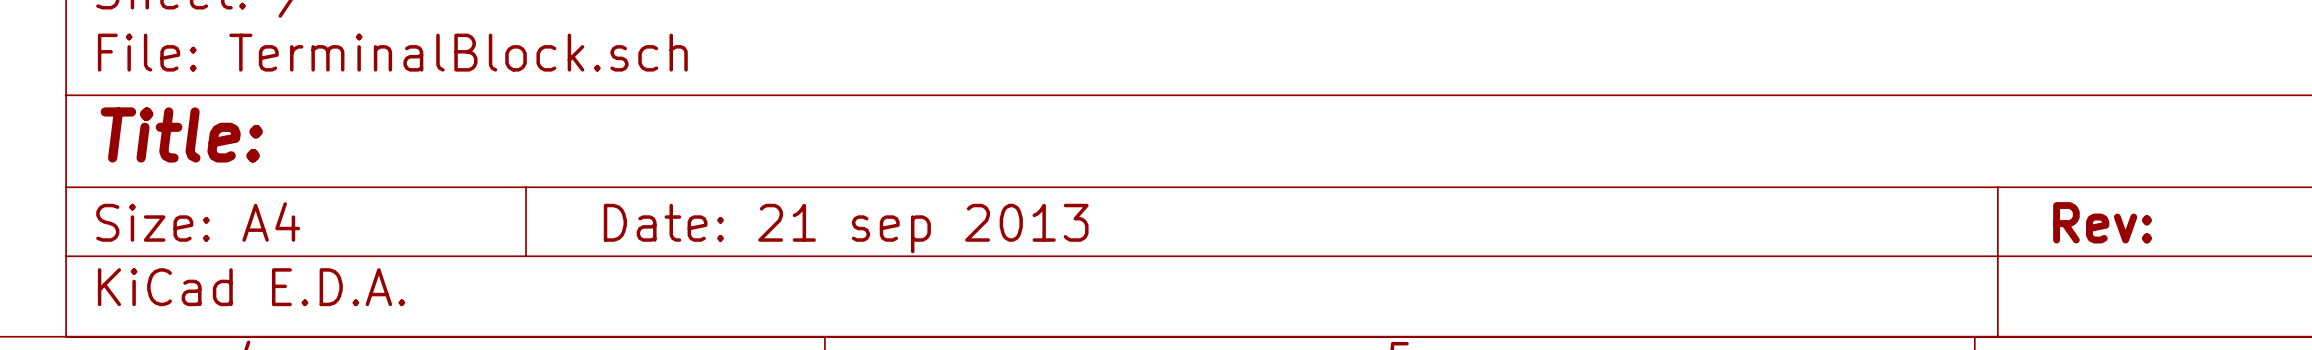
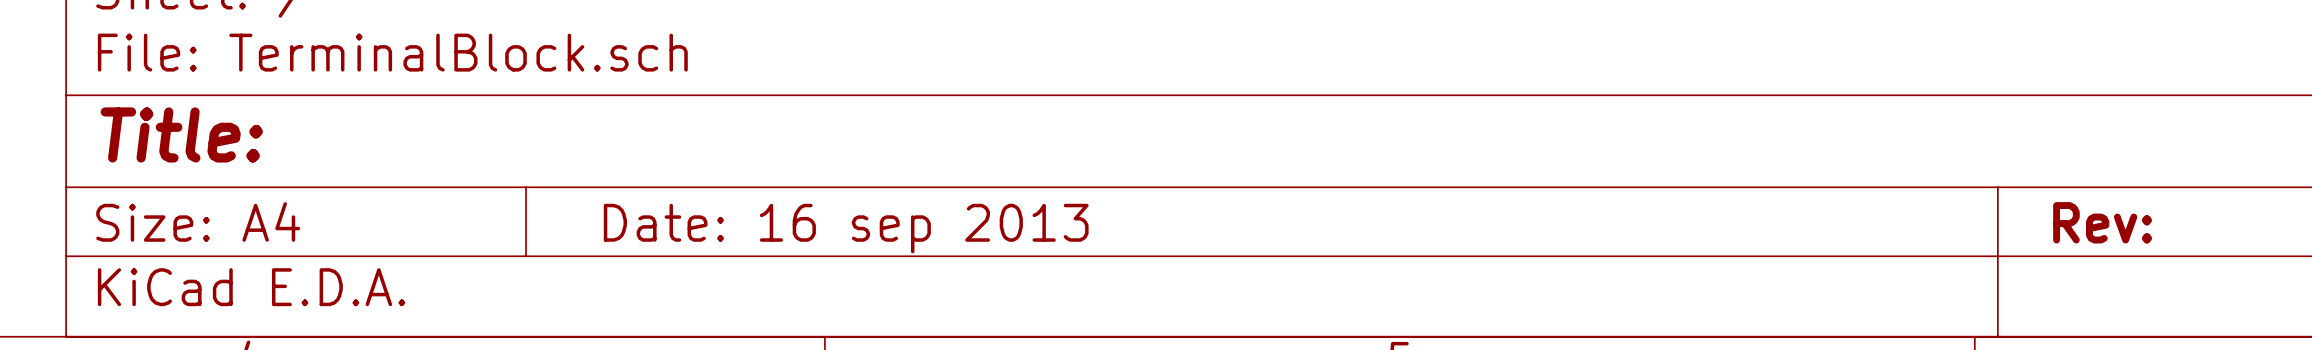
title block: Date: 21 sep 2013 (846, 228) -> Date: 16 sep 2013 (846, 228)

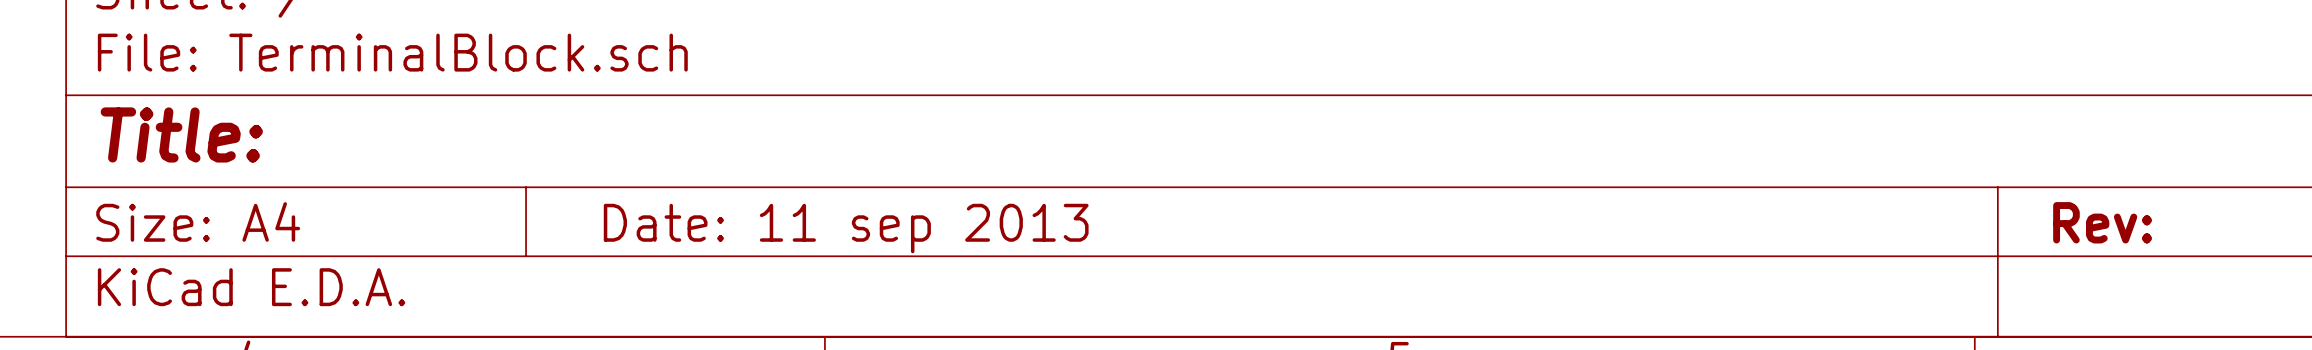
title block: Date: 16 sep 2013 (846, 228) -> Date: 11 sep 2013 (846, 228)

